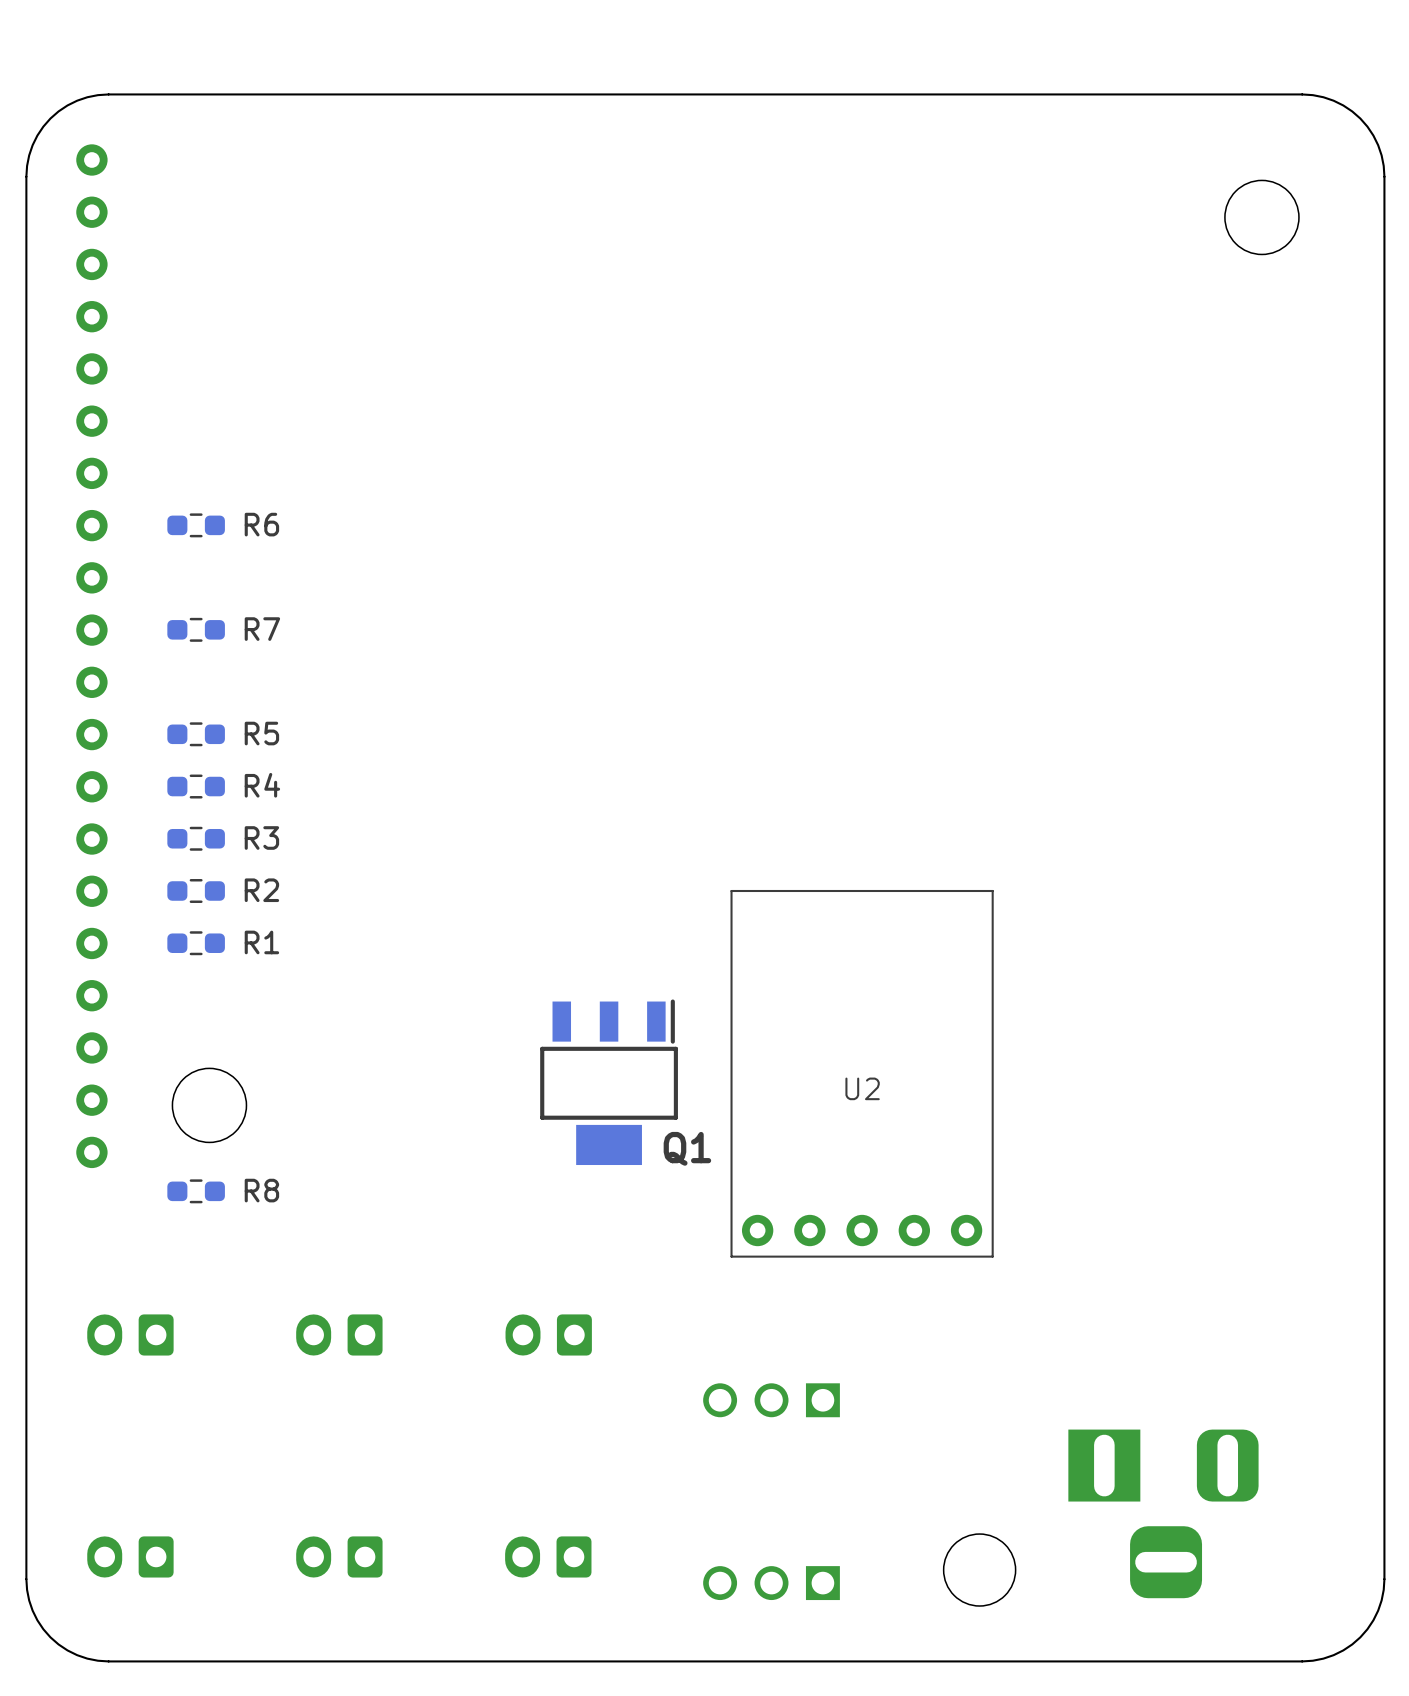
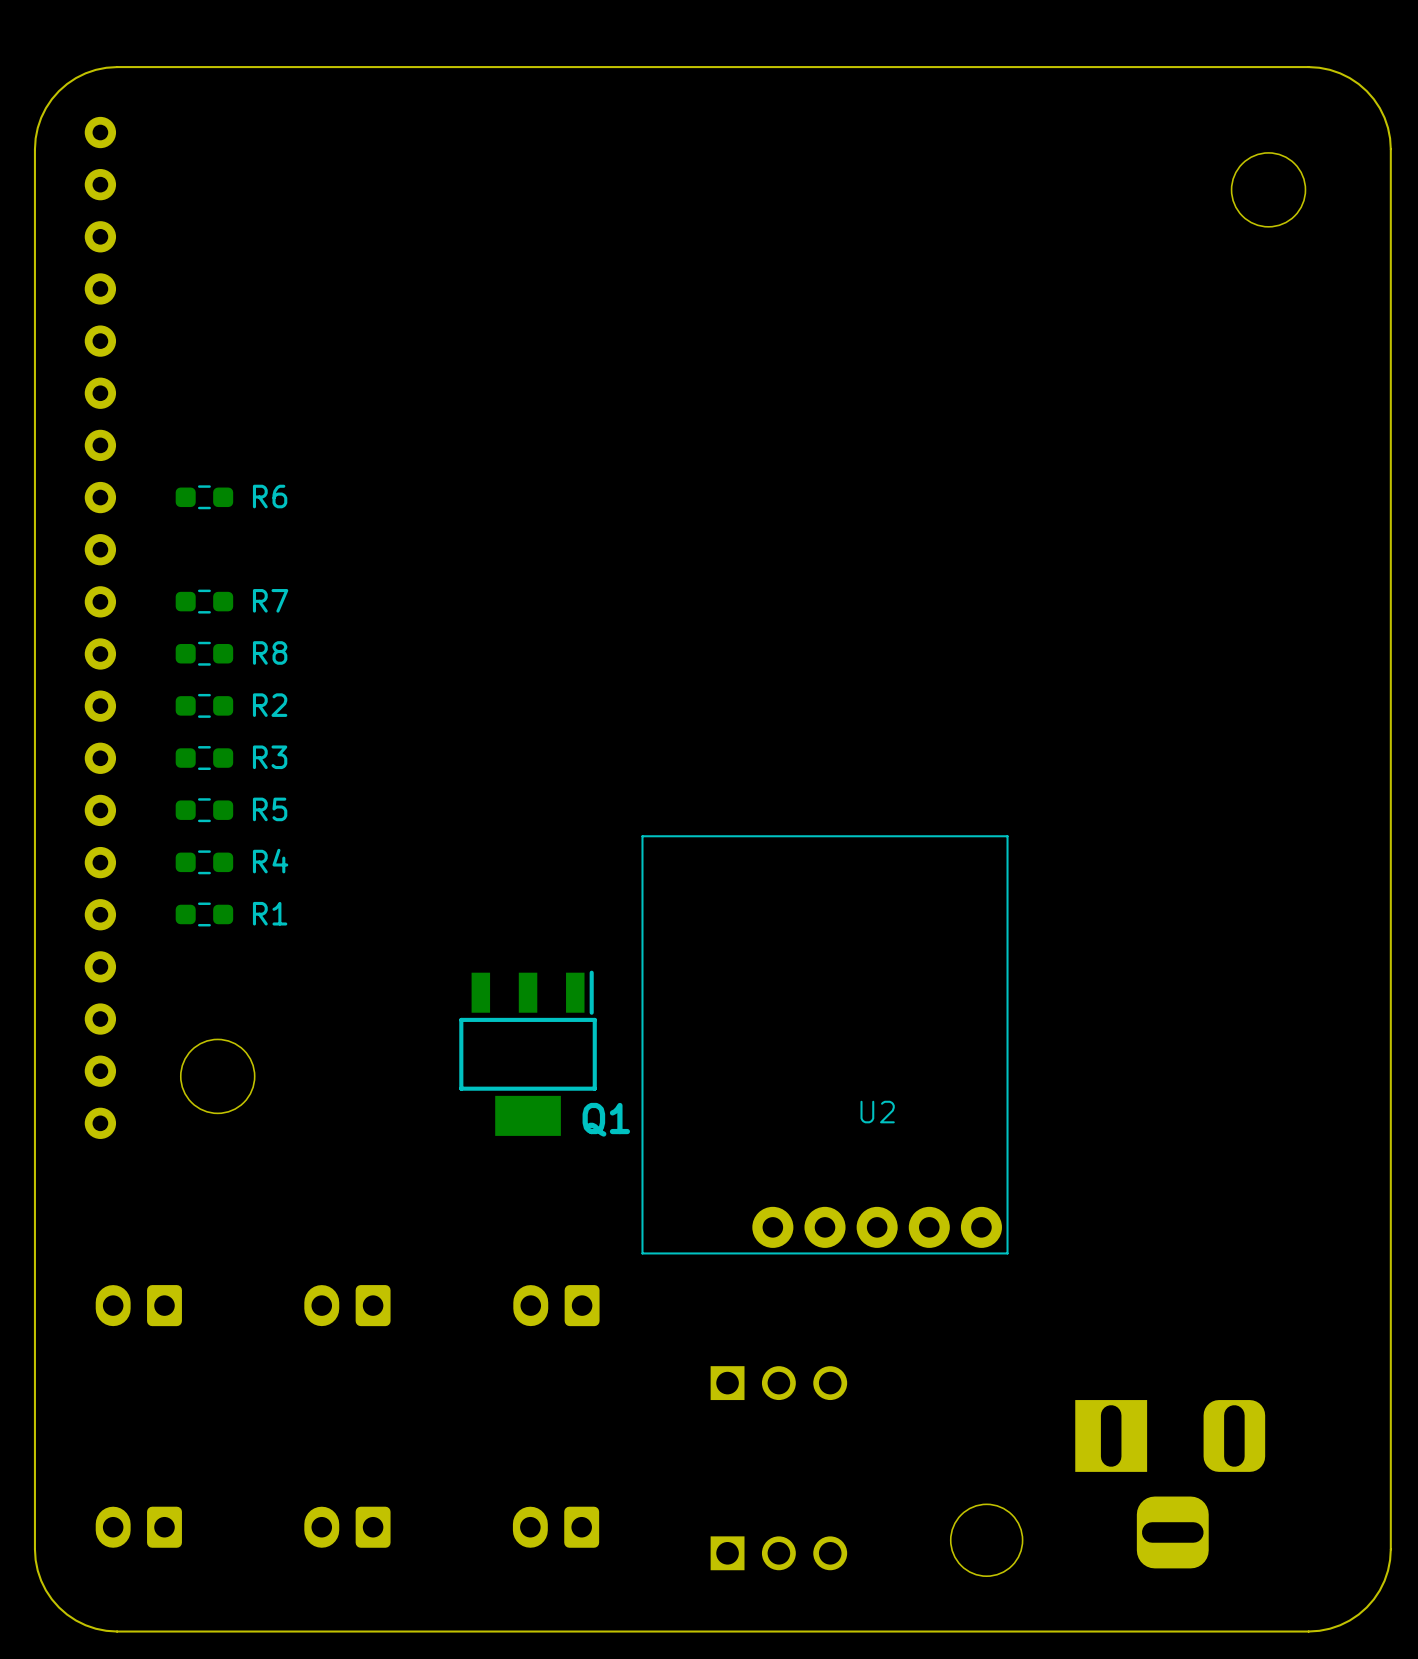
R5 name: R5 (261, 733) -> R2 (270, 705)
R4 name: R4 (262, 785) -> R3 (270, 757)
R3 name: R3 (261, 837) -> R5 (270, 809)
U2 footprint: [730, 889, 994, 1258] -> [641, 835, 1009, 1255]
R2 name: R2 (261, 890) -> R4 (270, 861)
Q1 position: (609, 1082) -> (528, 1053)
U2 name position: U2 (862, 1088) -> U2 (877, 1112)
R8 position: (196, 1191) -> (204, 653)
part rotation: 0° (771, 1400) -> 180° (778, 1383)
part rotation: 0° (771, 1583) -> 180° (778, 1553)

